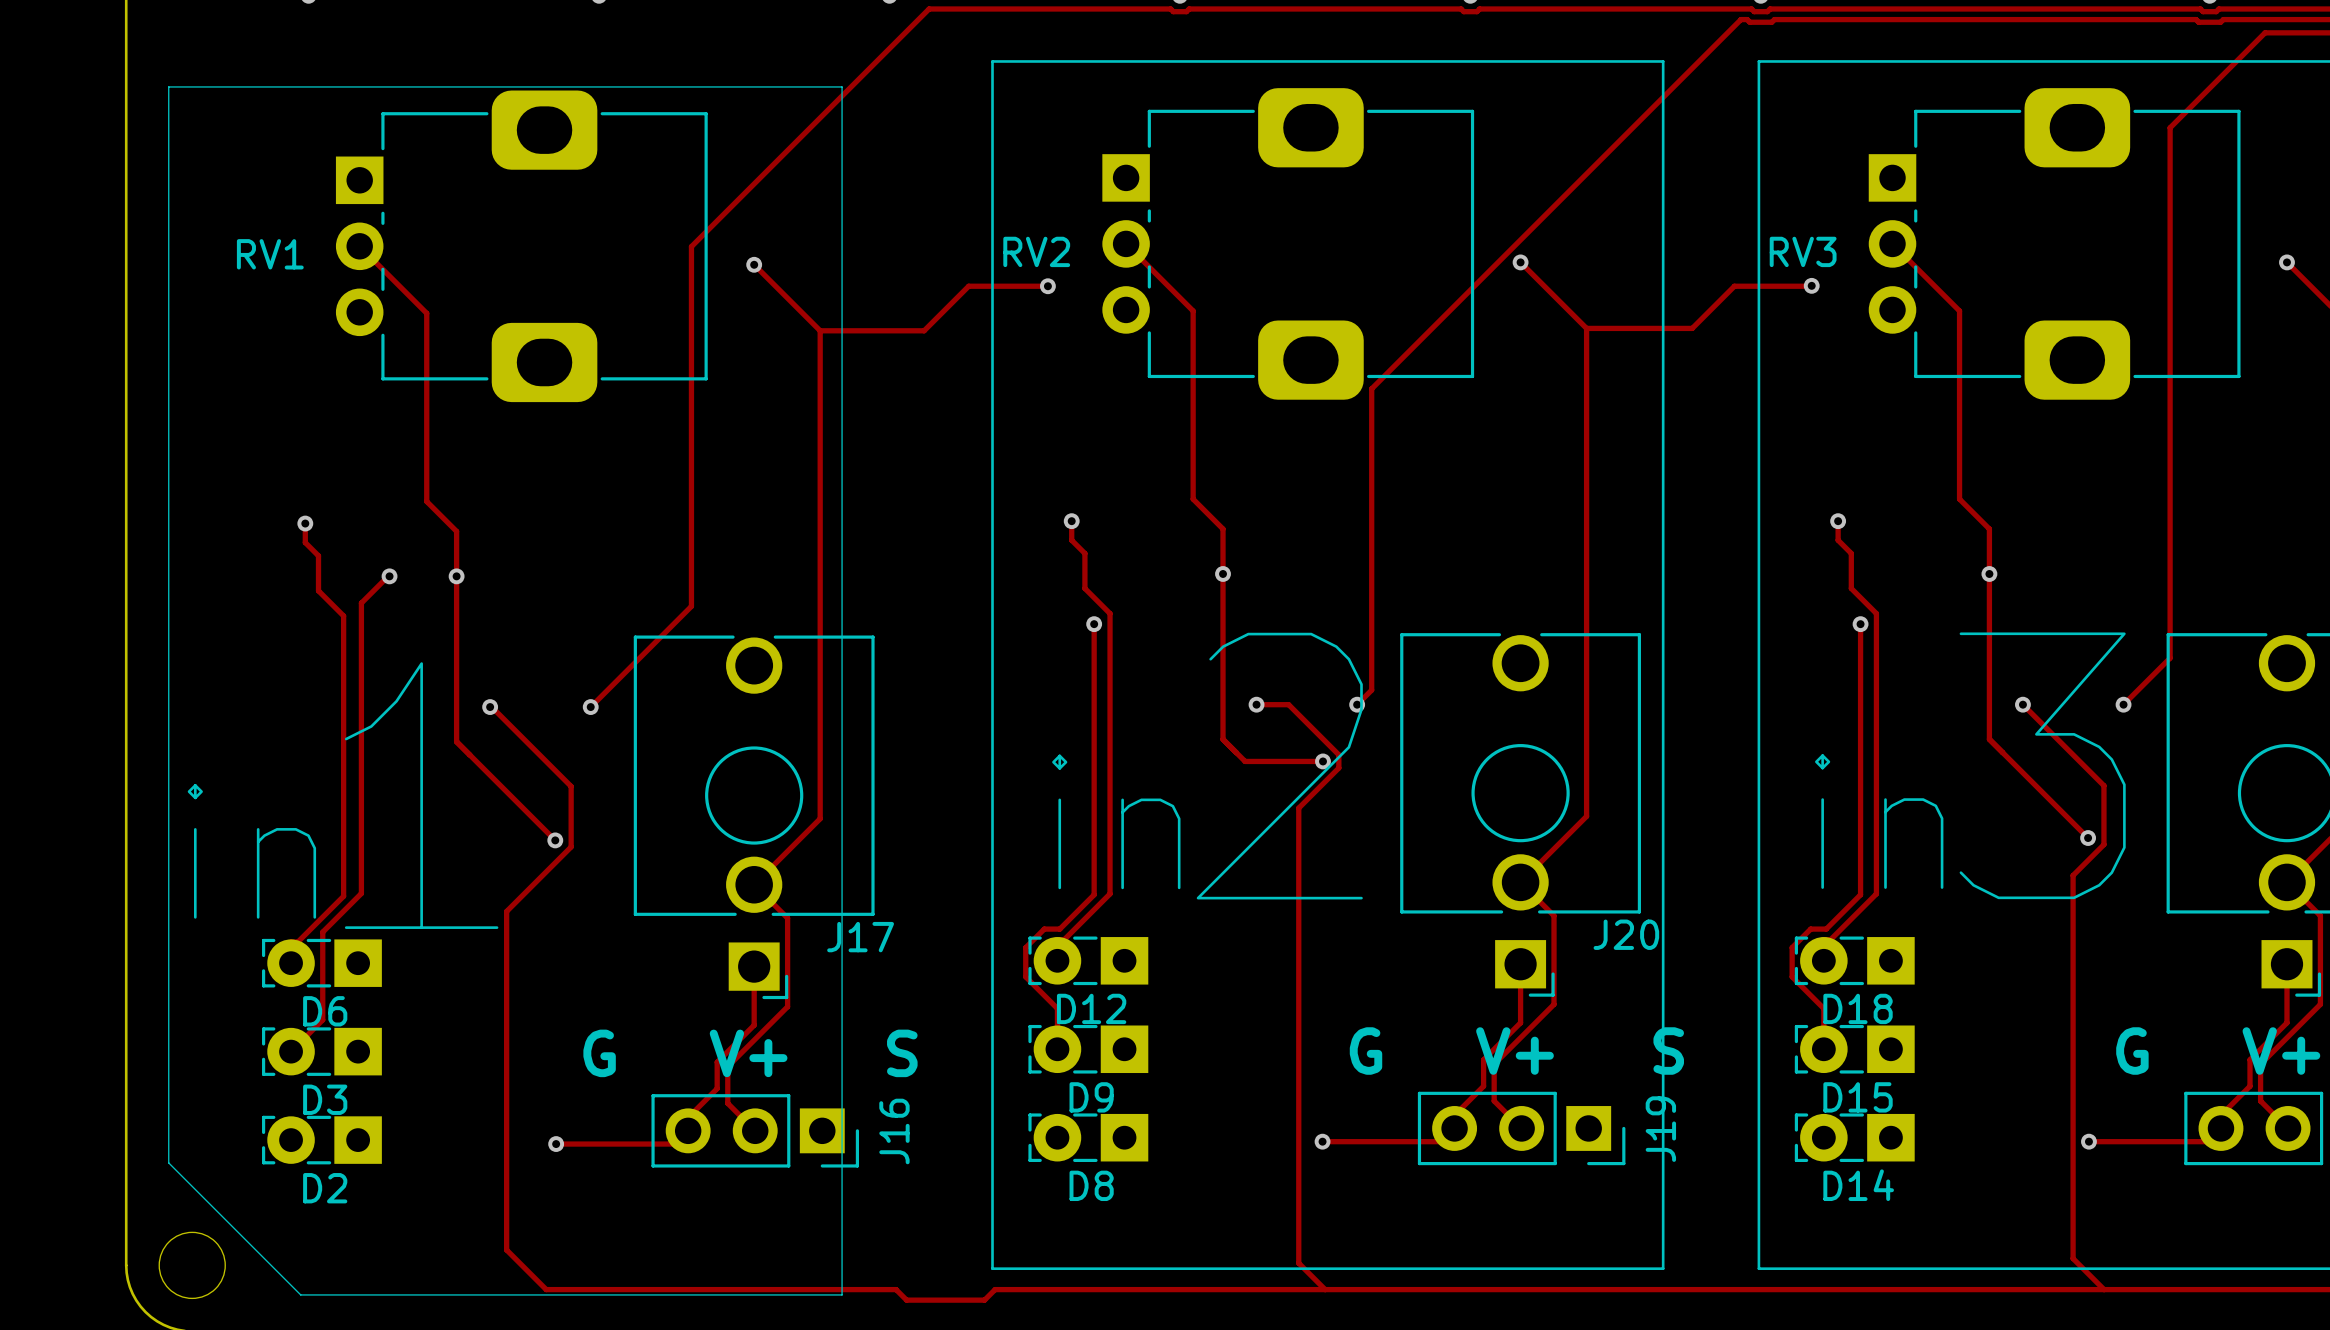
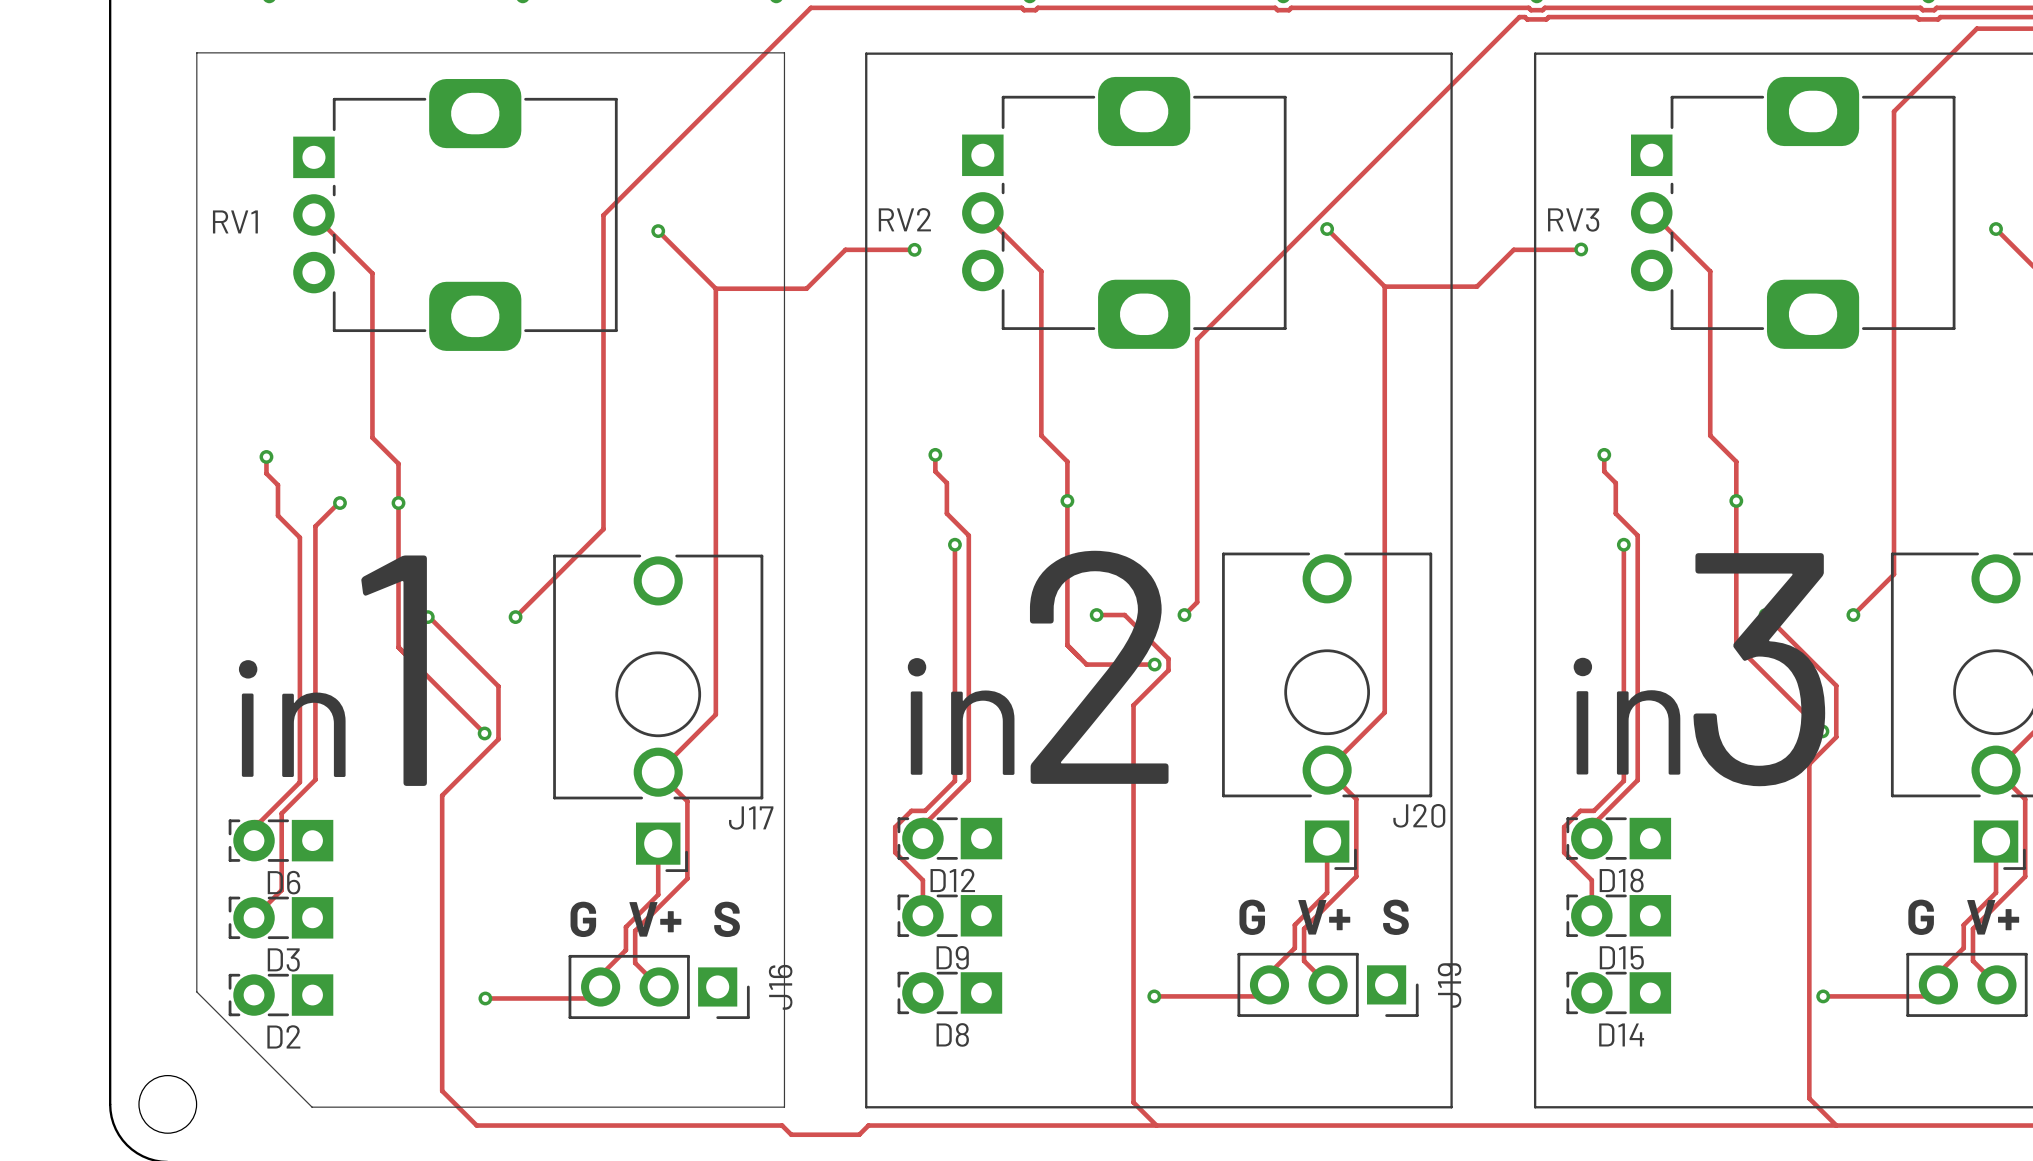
line: (168, 86) (842, 86) (842, 1294) (300, 1294) (168, 1162) (168, 86) -> (196, 52) (196, 991) (312, 1107) (784, 1107) (784, 52) (196, 52)
text position: 1 (421, 795) -> 1 (394, 670)
text position: in (251, 851) -> in (292, 718)

